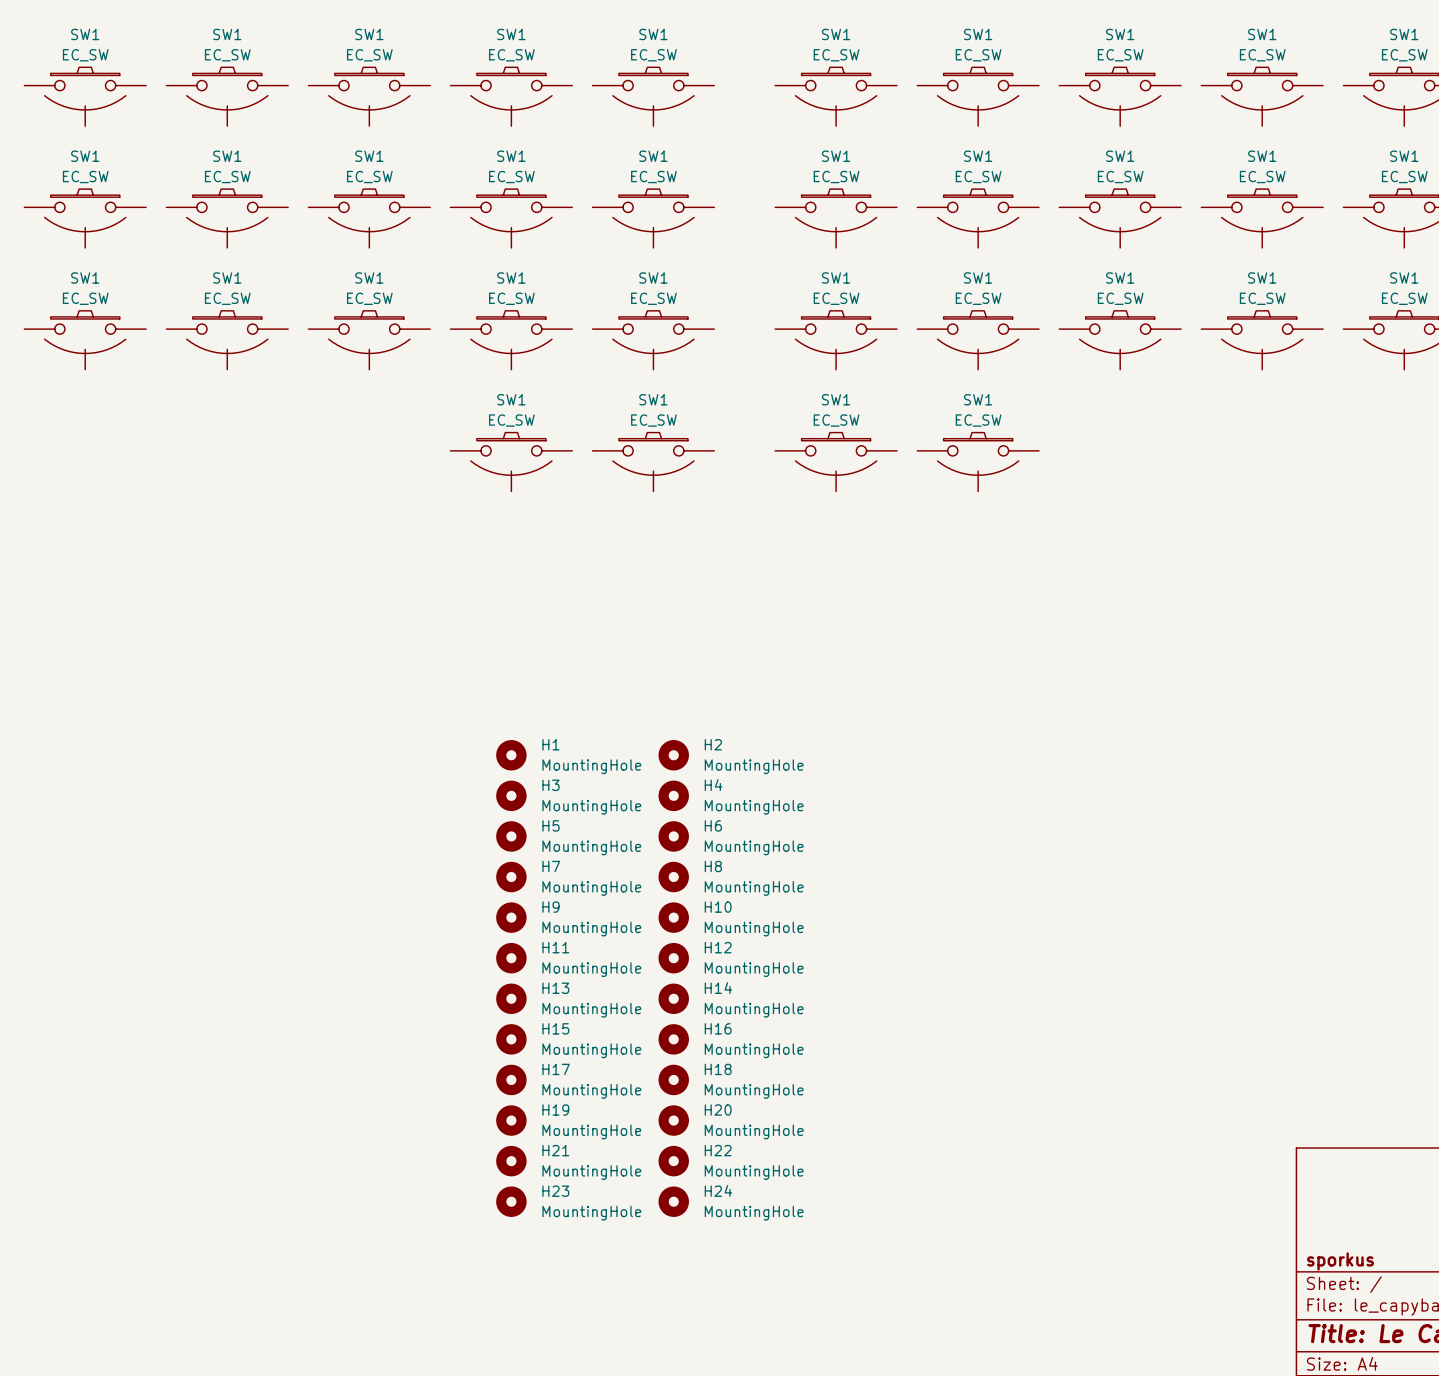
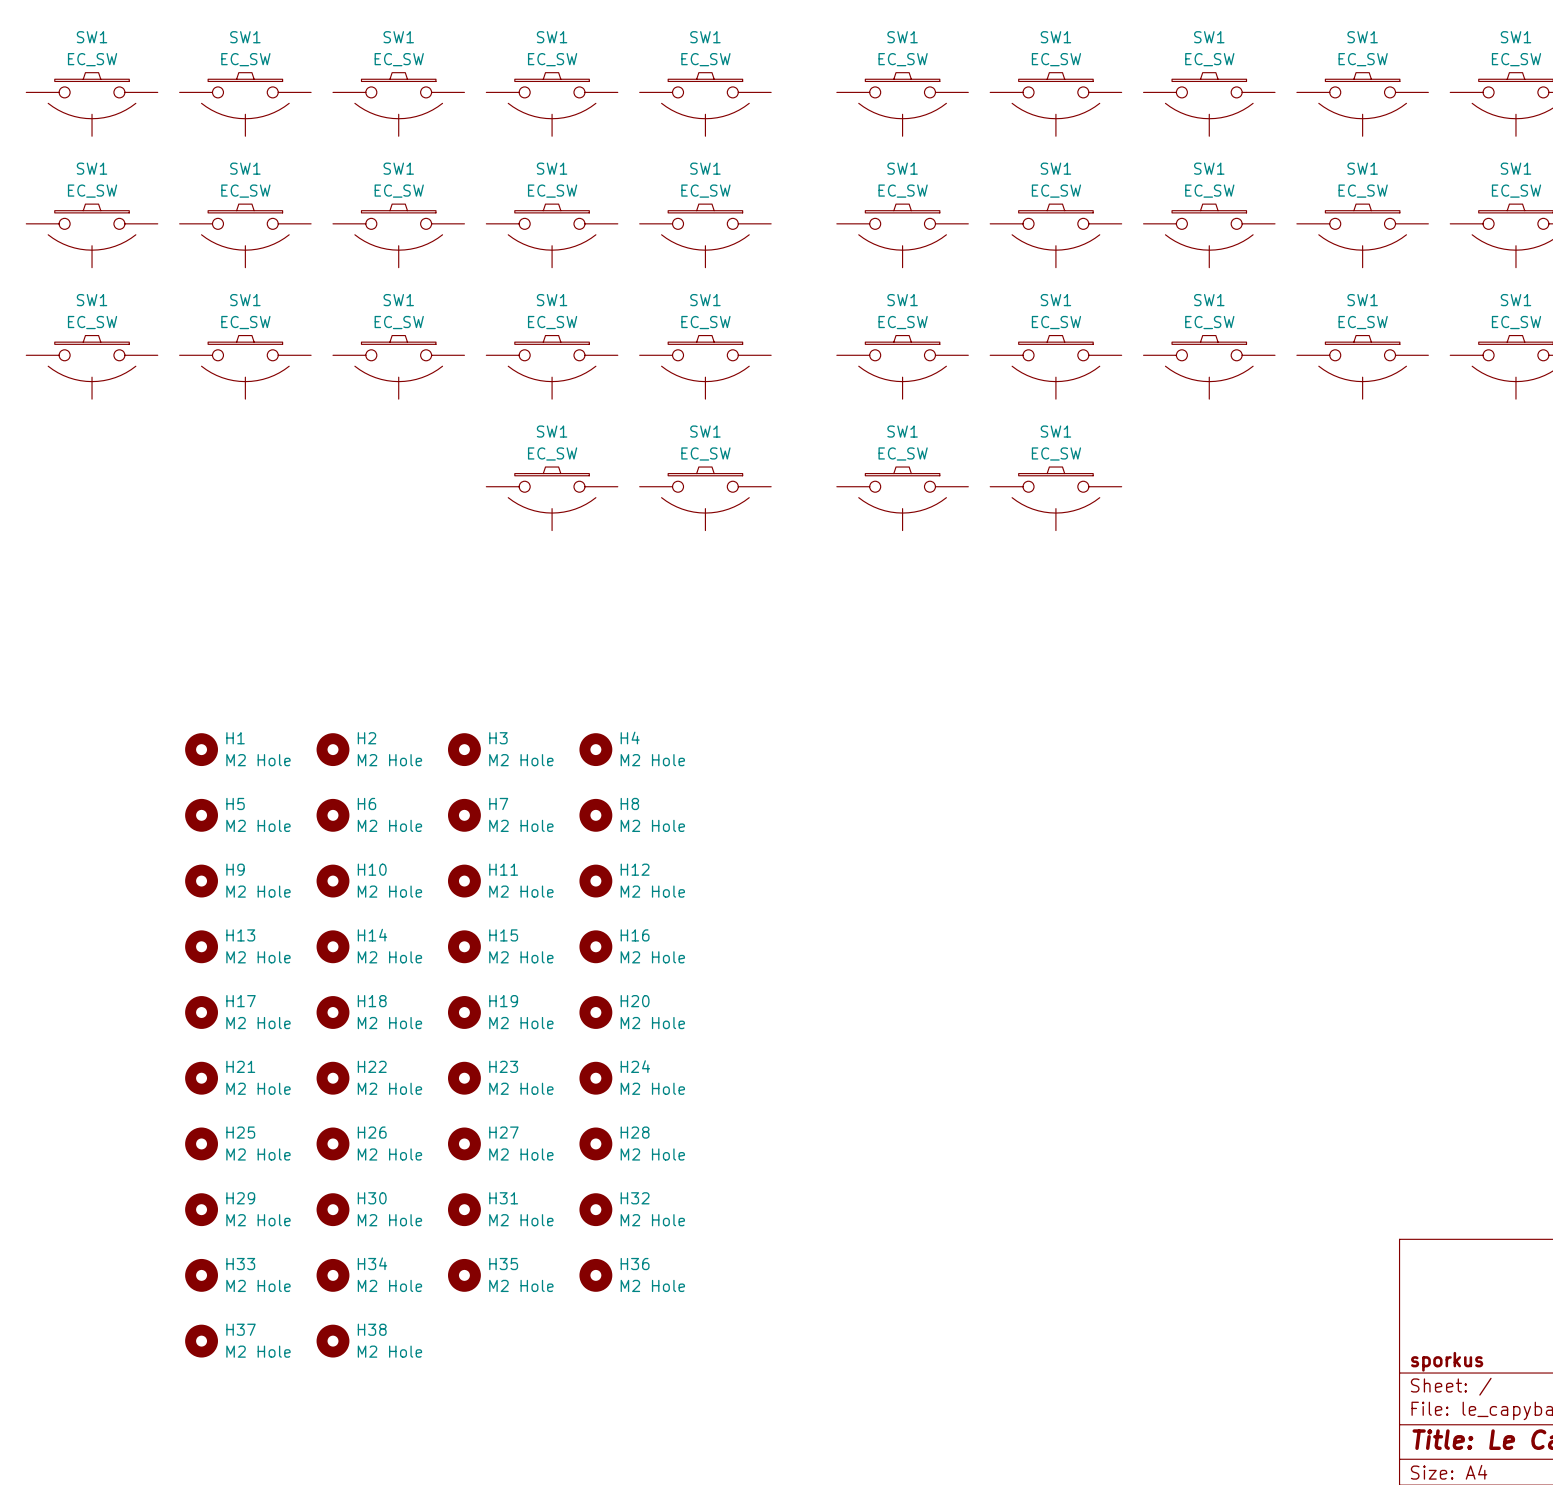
H1 name position: H1 (550, 744) -> H1 (235, 738)
H2 name position: H2 (713, 744) -> H2 (366, 738)
H1 position: (511, 755) -> (201, 749)
H2 position: (673, 755) -> (332, 749)
H1 value: MountingHole (591, 766) -> M2 Hole (258, 760)
H2 value: MountingHole (754, 766) -> M2 Hole (389, 760)
H3 name position: H3 (550, 785) -> H3 (498, 738)
H4 name position: H4 (713, 785) -> H4 (630, 737)
H3 position: (511, 795) -> (464, 749)
H4 position: (673, 795) -> (595, 749)
H3 value: MountingHole (591, 807) -> M2 Hole (521, 760)
H4 value: MountingHole (754, 807) -> M2 Hole (652, 760)
H5 name position: H5 (550, 825) -> H5 (235, 803)
H6 name position: H6 (713, 825) -> H6 (366, 803)
H5 position: (511, 836) -> (201, 815)
H6 position: (673, 836) -> (332, 815)
H5 value: MountingHole (591, 847) -> M2 Hole (258, 825)
H6 value: MountingHole (754, 847) -> M2 Hole (389, 825)
H7 name position: H7 (551, 866) -> H7 (498, 803)
H8 name position: H8 (713, 866) -> H8 (629, 803)
H7 position: (511, 877) -> (464, 815)
H8 position: (673, 877) -> (595, 815)
H7 value: MountingHole (591, 888) -> M2 Hole (521, 825)
H8 value: MountingHole (754, 888) -> M2 Hole (652, 825)
H9 name position: H9 (550, 907) -> H9 (235, 869)
H10 name position: H10 (718, 907) -> H10 (372, 869)
H9 position: (511, 917) -> (201, 881)
H10 position: (673, 917) -> (332, 881)
H9 value: MountingHole (591, 929) -> M2 Hole (258, 891)
H10 value: MountingHole (754, 929) -> M2 Hole (389, 891)
H11 name position: H11 (555, 947) -> H11 (503, 869)
H12 name position: H12 (718, 947) -> H12 (635, 869)
H11 position: (511, 958) -> (464, 881)
H12 position: (673, 958) -> (595, 881)
H11 value: MountingHole (591, 969) -> M2 Hole (521, 891)
H12 value: MountingHole (754, 969) -> M2 Hole (652, 891)
H13 name position: H13 (555, 988) -> H13 (240, 935)
H14 name position: H14 (718, 988) -> H14 (372, 935)
H13 position: (511, 998) -> (201, 946)
H14 position: (673, 998) -> (332, 946)
H13 value: MountingHole (591, 1010) -> M2 Hole (258, 957)
H14 value: MountingHole (754, 1010) -> M2 Hole (389, 957)
H15 name position: H15 (555, 1028) -> H15 (503, 935)
H16 name position: H16 (718, 1028) -> H16 (635, 935)
H15 position: (511, 1039) -> (464, 946)
H16 position: (673, 1039) -> (595, 946)
H15 value: MountingHole (591, 1050) -> M2 Hole (521, 957)
H16 value: MountingHole (754, 1050) -> M2 Hole (652, 957)
H25: none -> M2 Hole (201, 1143)
H26: none -> M2 Hole (332, 1143)
H27: none -> M2 Hole (464, 1143)
H28: none -> M2 Hole (595, 1143)
H17 name position: H17 (556, 1069) -> H17 (241, 1001)
H18 name position: H18 (718, 1069) -> H18 (372, 1001)
H17 position: (511, 1079) -> (201, 1012)
H18 position: (673, 1079) -> (332, 1012)
H17 value: MountingHole (591, 1091) -> M2 Hole (258, 1023)
H18 value: MountingHole (754, 1091) -> M2 Hole (389, 1023)
H19 name position: H19 (555, 1110) -> H19 (503, 1001)
H20 name position: H20 (718, 1110) -> H20 (635, 1001)
H29: none -> M2 Hole (201, 1209)
H30: none -> M2 Hole (332, 1209)
H31: none -> M2 Hole (464, 1209)
H19 position: (511, 1120) -> (464, 1012)
H32: none -> M2 Hole (595, 1209)
H20 position: (673, 1120) -> (595, 1012)
H19 value: MountingHole (591, 1132) -> M2 Hole (521, 1023)
H20 value: MountingHole (754, 1132) -> M2 Hole (652, 1023)
H21 name position: H21 (555, 1150) -> H21 (240, 1066)
H22 name position: H22 (718, 1150) -> H22 (372, 1066)
H21 position: (511, 1161) -> (201, 1078)
H22 position: (673, 1161) -> (332, 1078)
H21 value: MountingHole (591, 1172) -> M2 Hole (258, 1088)
H22 value: MountingHole (754, 1172) -> M2 Hole (389, 1088)
H33: none -> M2 Hole (201, 1275)
H34: none -> M2 Hole (332, 1275)
H35: none -> M2 Hole (464, 1275)
H36: none -> M2 Hole (595, 1275)
H24 name position: H24 (718, 1190) -> H24 (635, 1066)
H23 name position: H23 (555, 1191) -> H23 (503, 1066)
H23 position: (511, 1201) -> (464, 1078)
H24 position: (673, 1201) -> (595, 1078)
H23 value: MountingHole (591, 1213) -> M2 Hole (521, 1088)
H24 value: MountingHole (754, 1213) -> M2 Hole (652, 1088)
H37: none -> M2 Hole (201, 1341)
H38: none -> M2 Hole (332, 1341)

